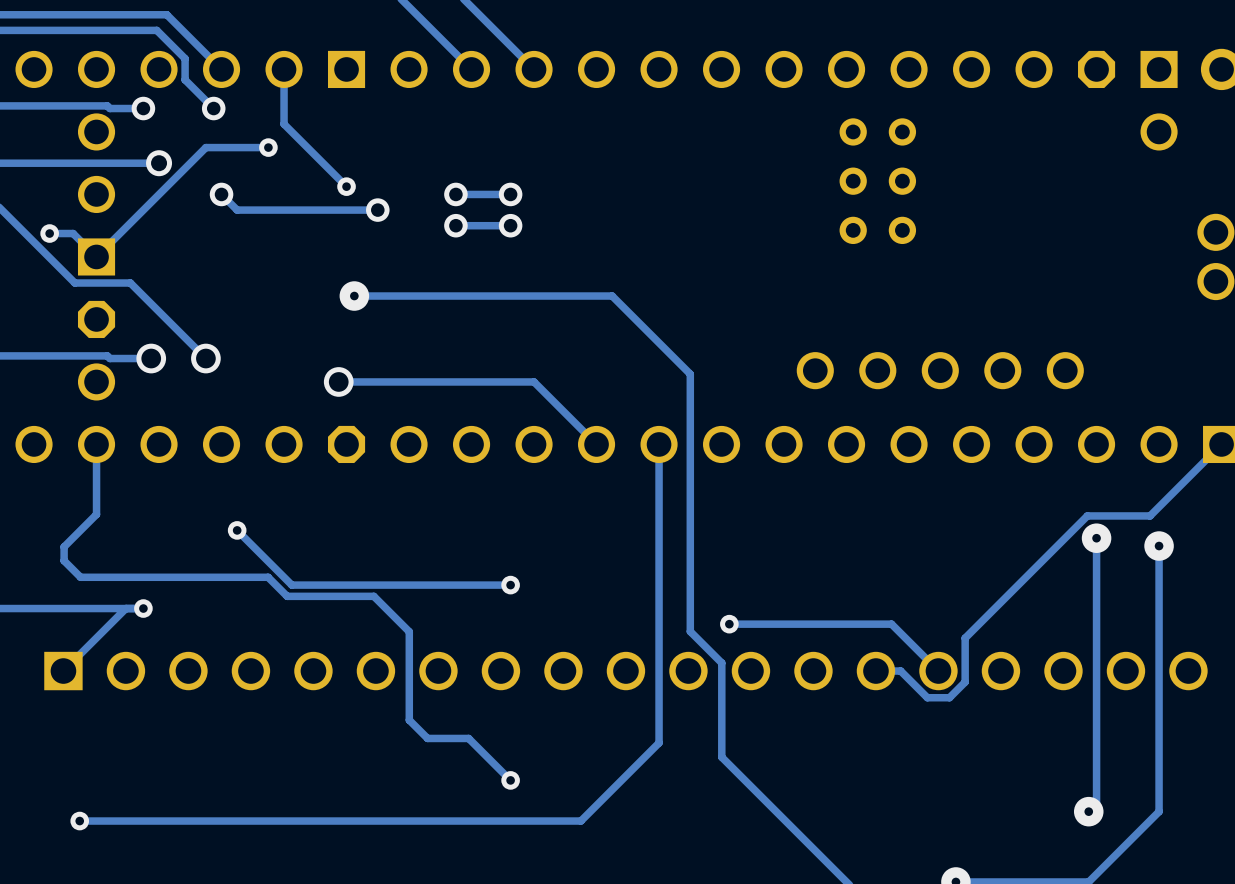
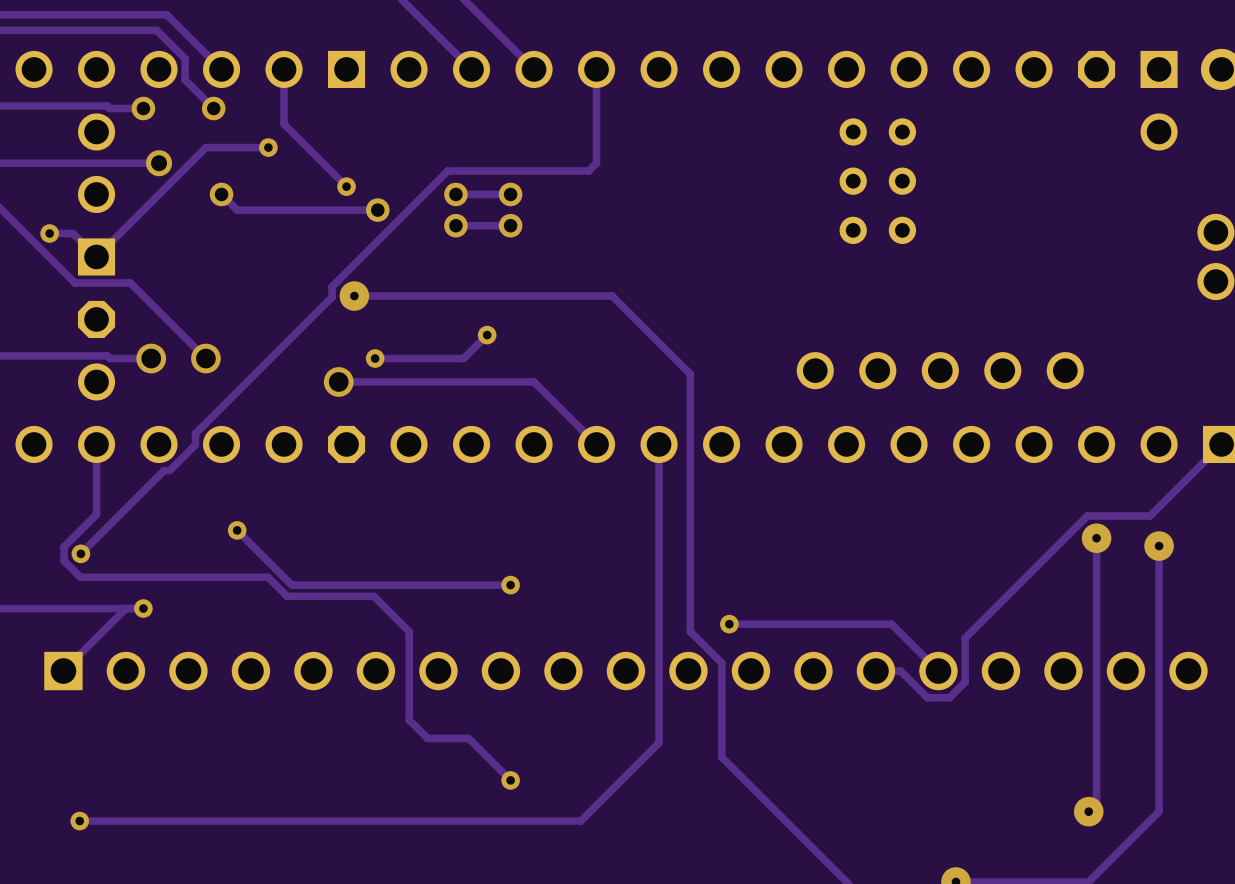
track: none -> (596, 69) (596, 163) (588, 171) (447, 171) (332, 286) (332, 297) (195, 433) (195, 444) (169, 470) (164, 470) (80, 553)
track: none -> (487, 335) (463, 358) (375, 358)
via: none -> (487, 335)
via: none -> (375, 358)
via: none -> (80, 553)

